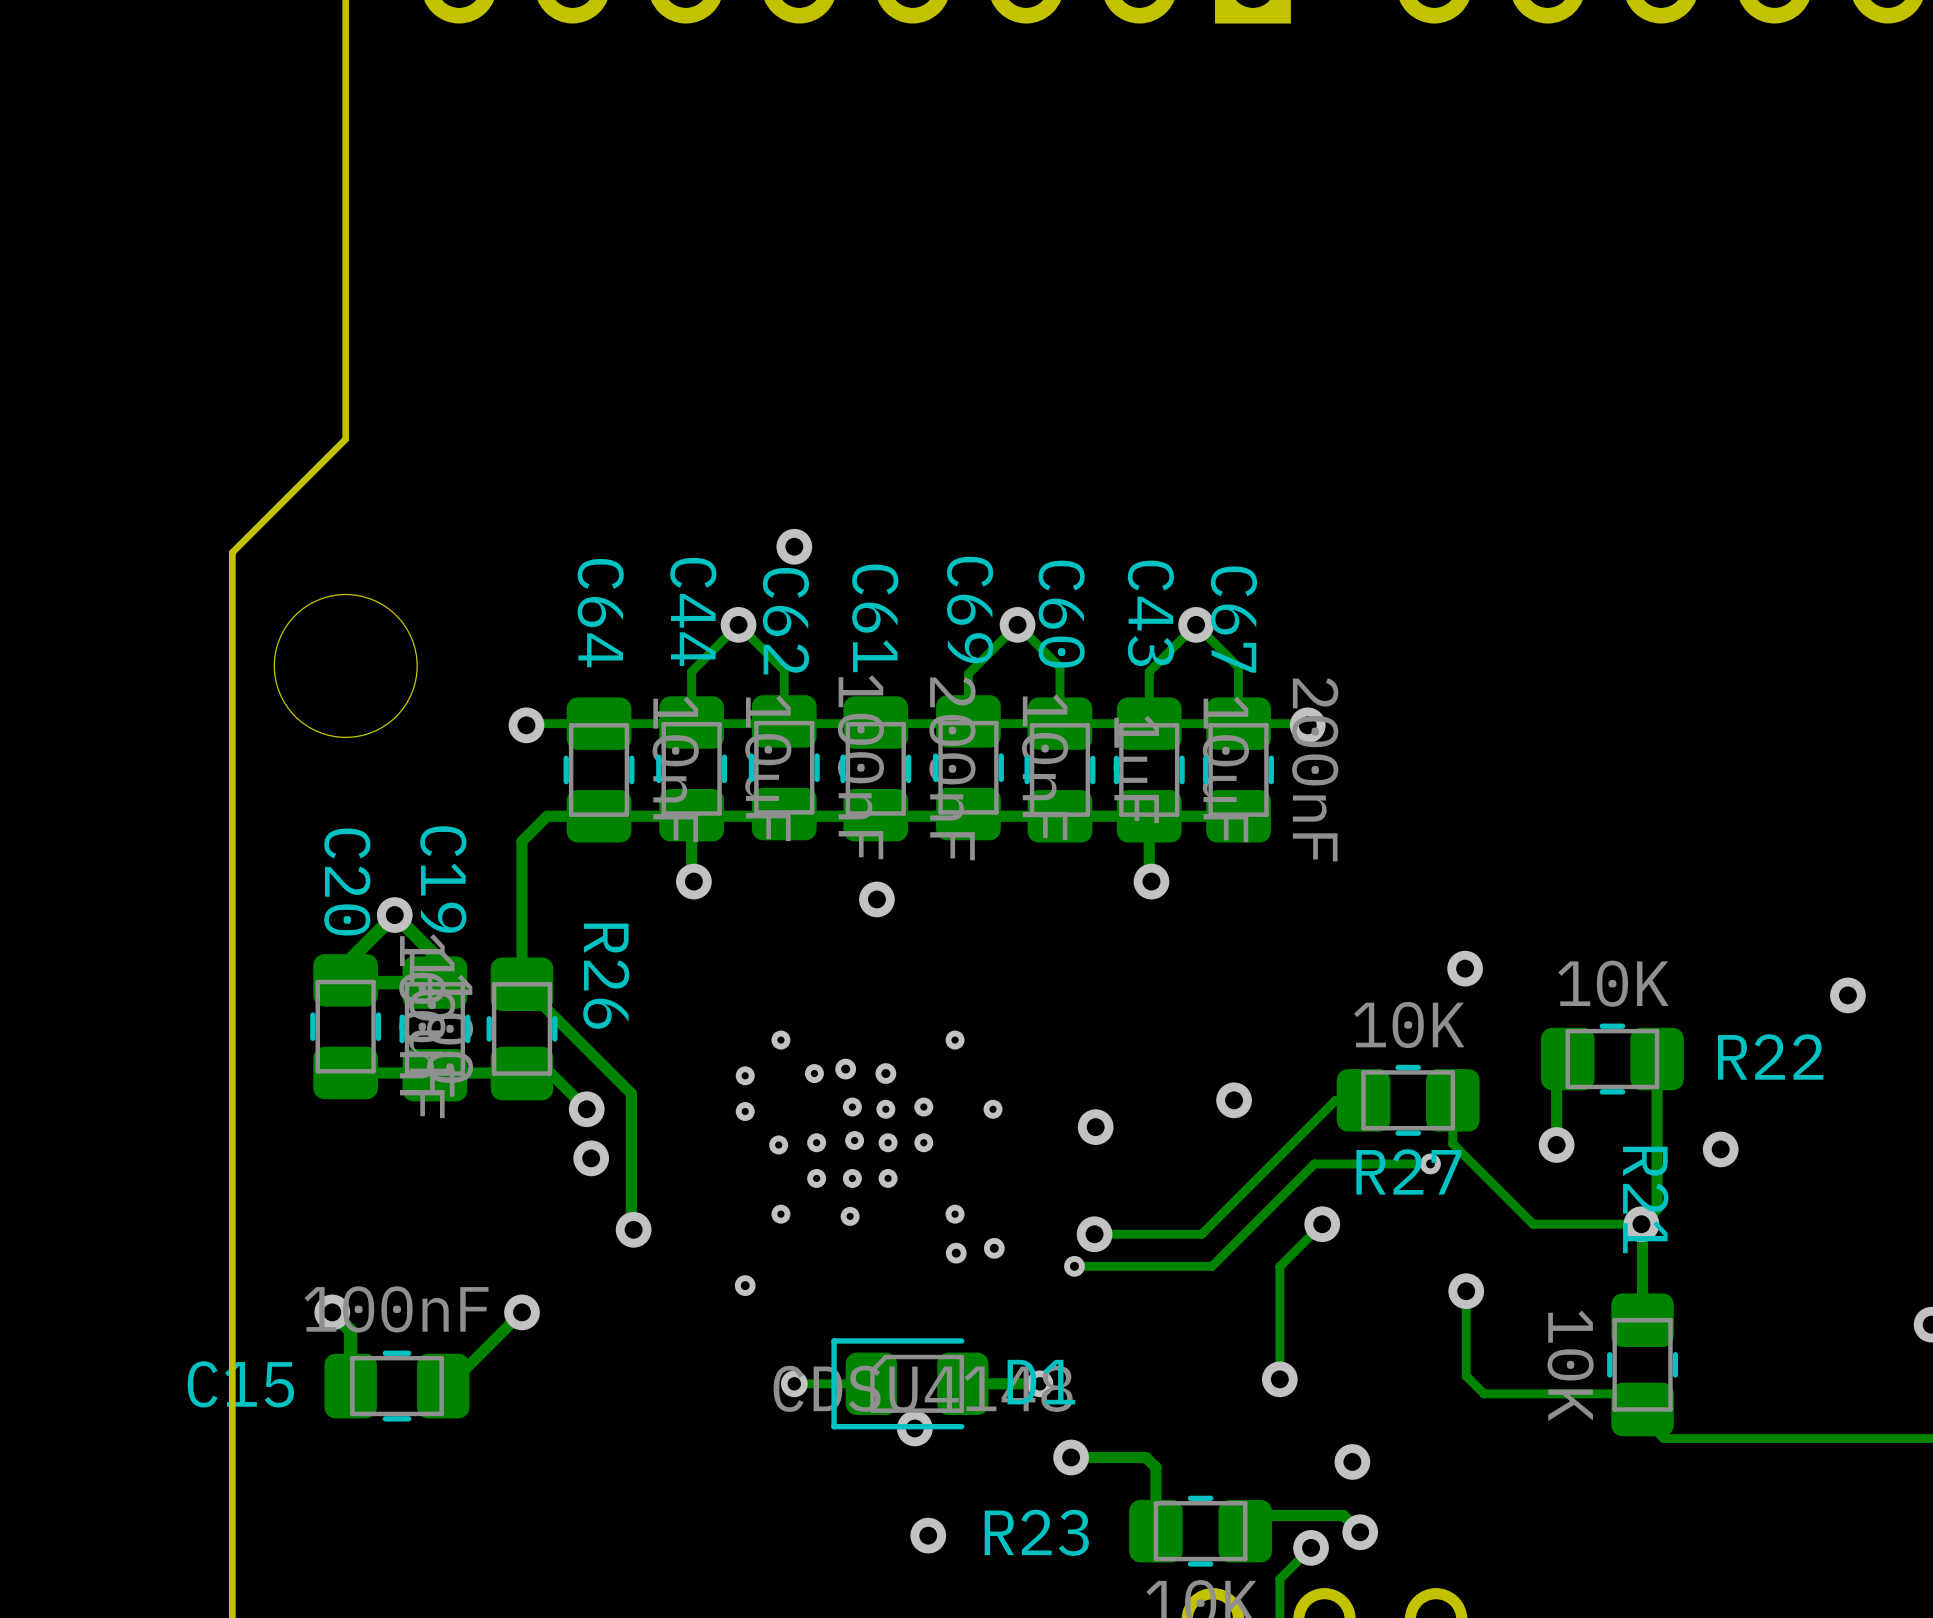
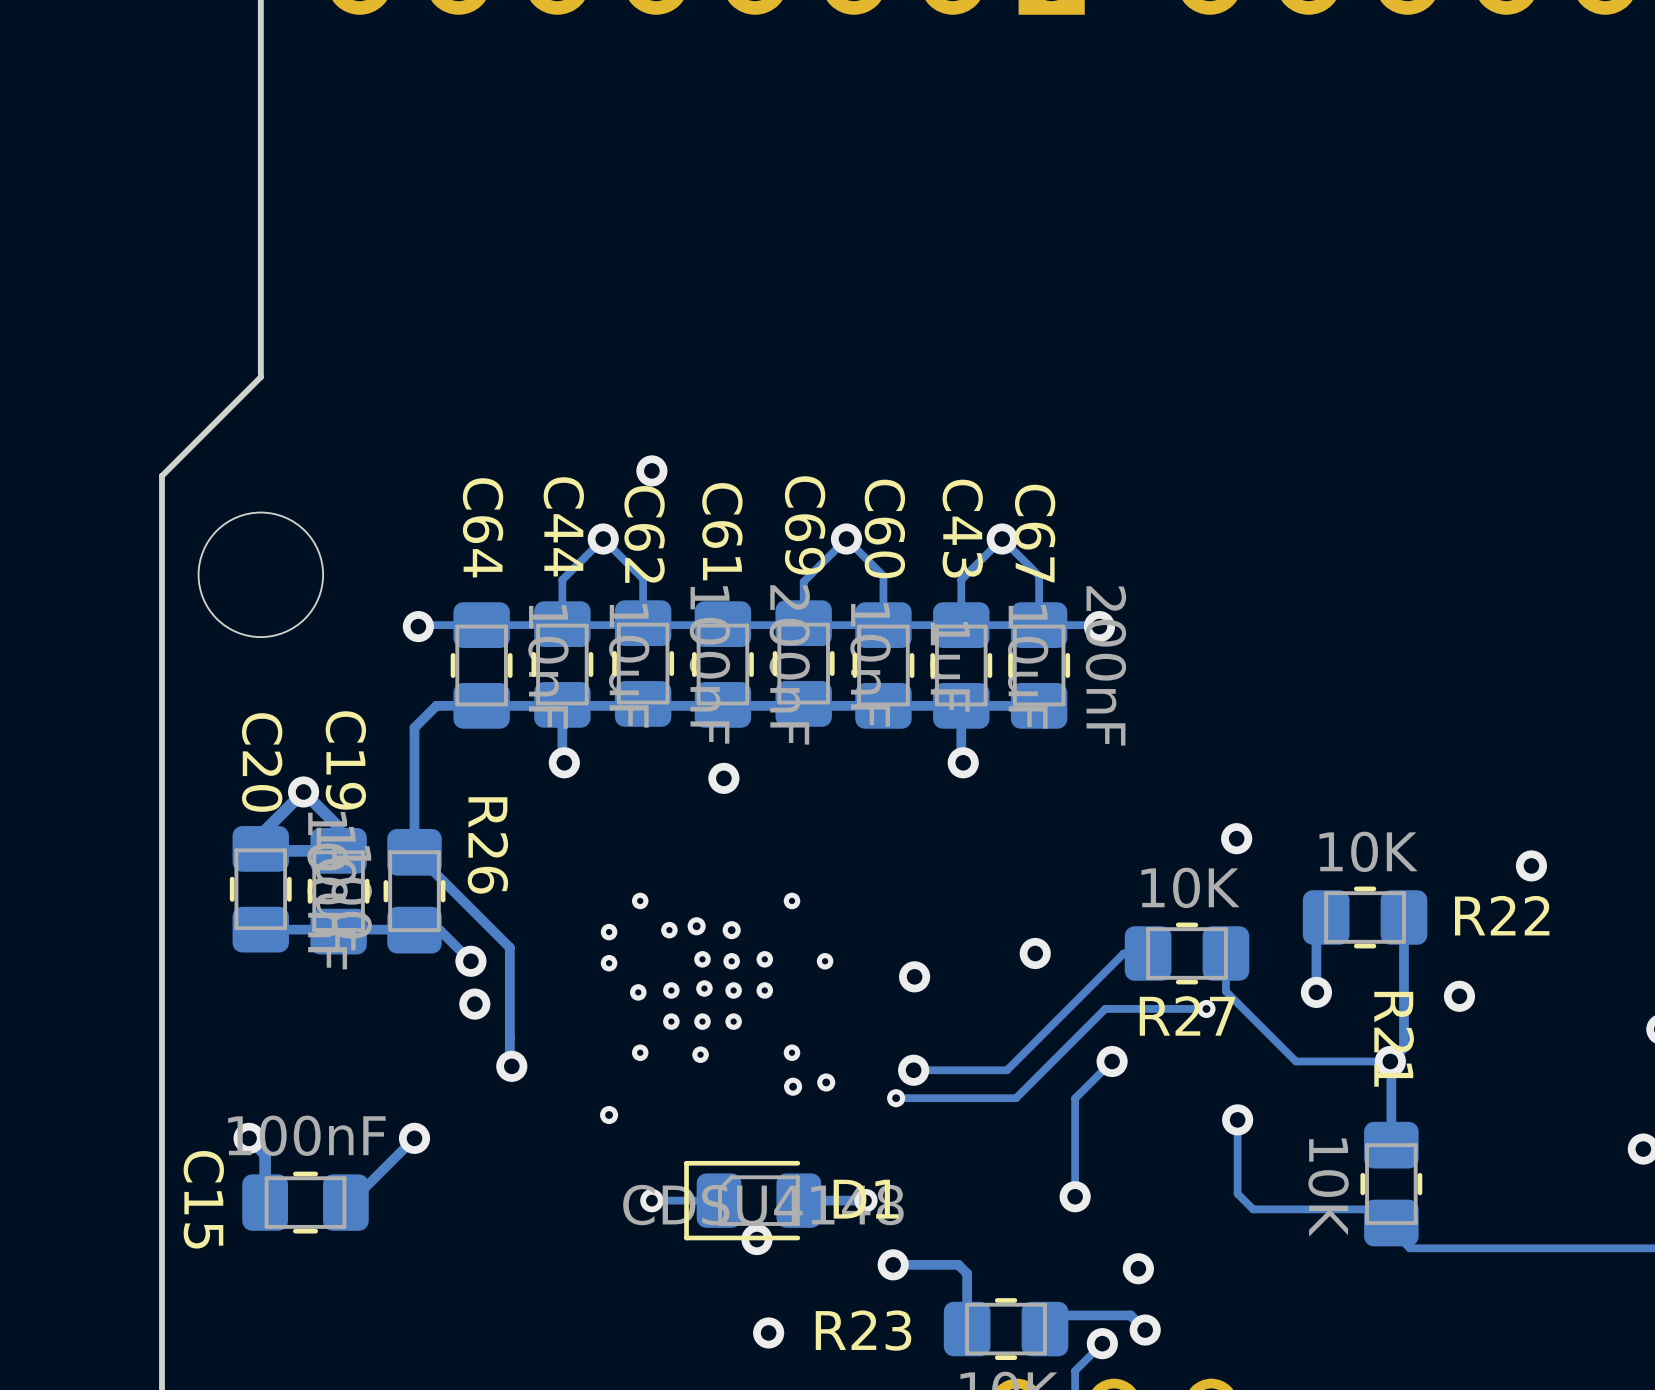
via position: (1847, 995) -> (1531, 865)
C15 name rotation: 0° (240, 1384) -> 90° clockwise (203, 1199)

